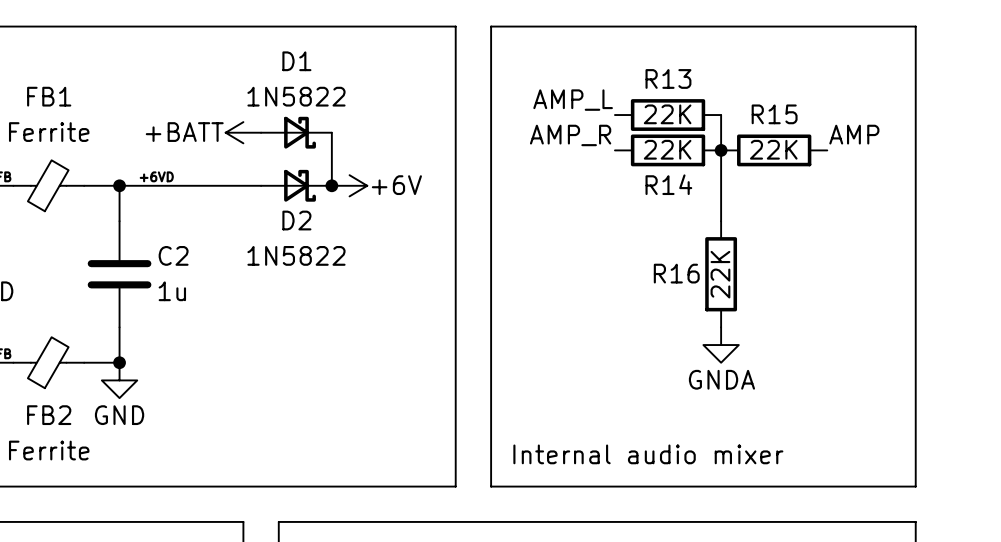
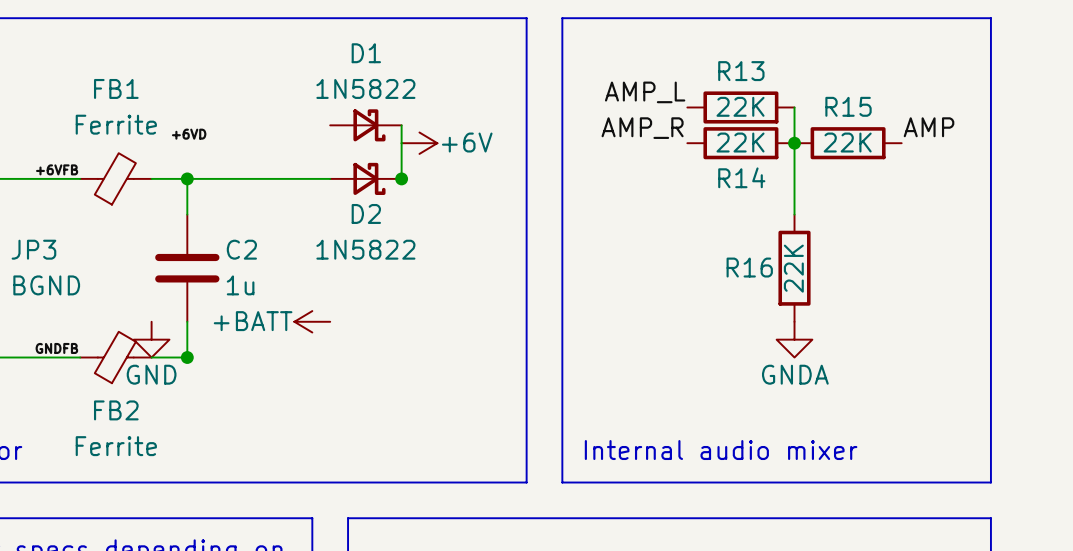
power symbol: +BATT (243, 132) -> none
label position: +6VD (156, 176) -> +6VD (189, 134)
power symbol position: +6V (349, 185) -> +6V (419, 143)
power symbol: none -> +BATT (312, 321)
power symbol position: GND (119, 380) -> GND (151, 339)

